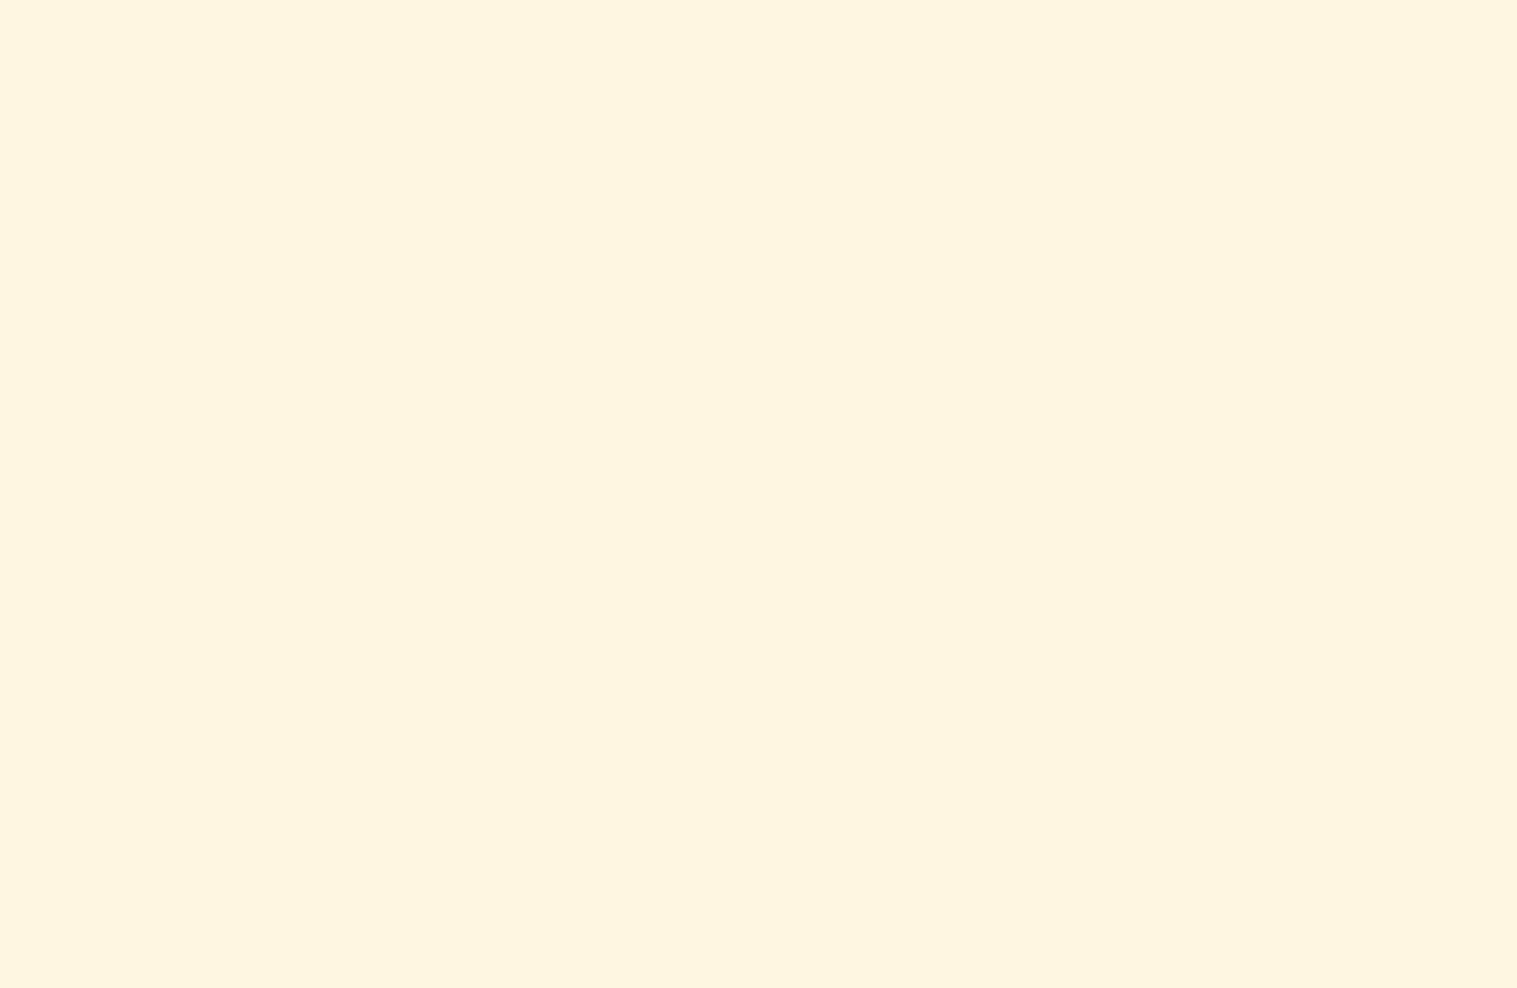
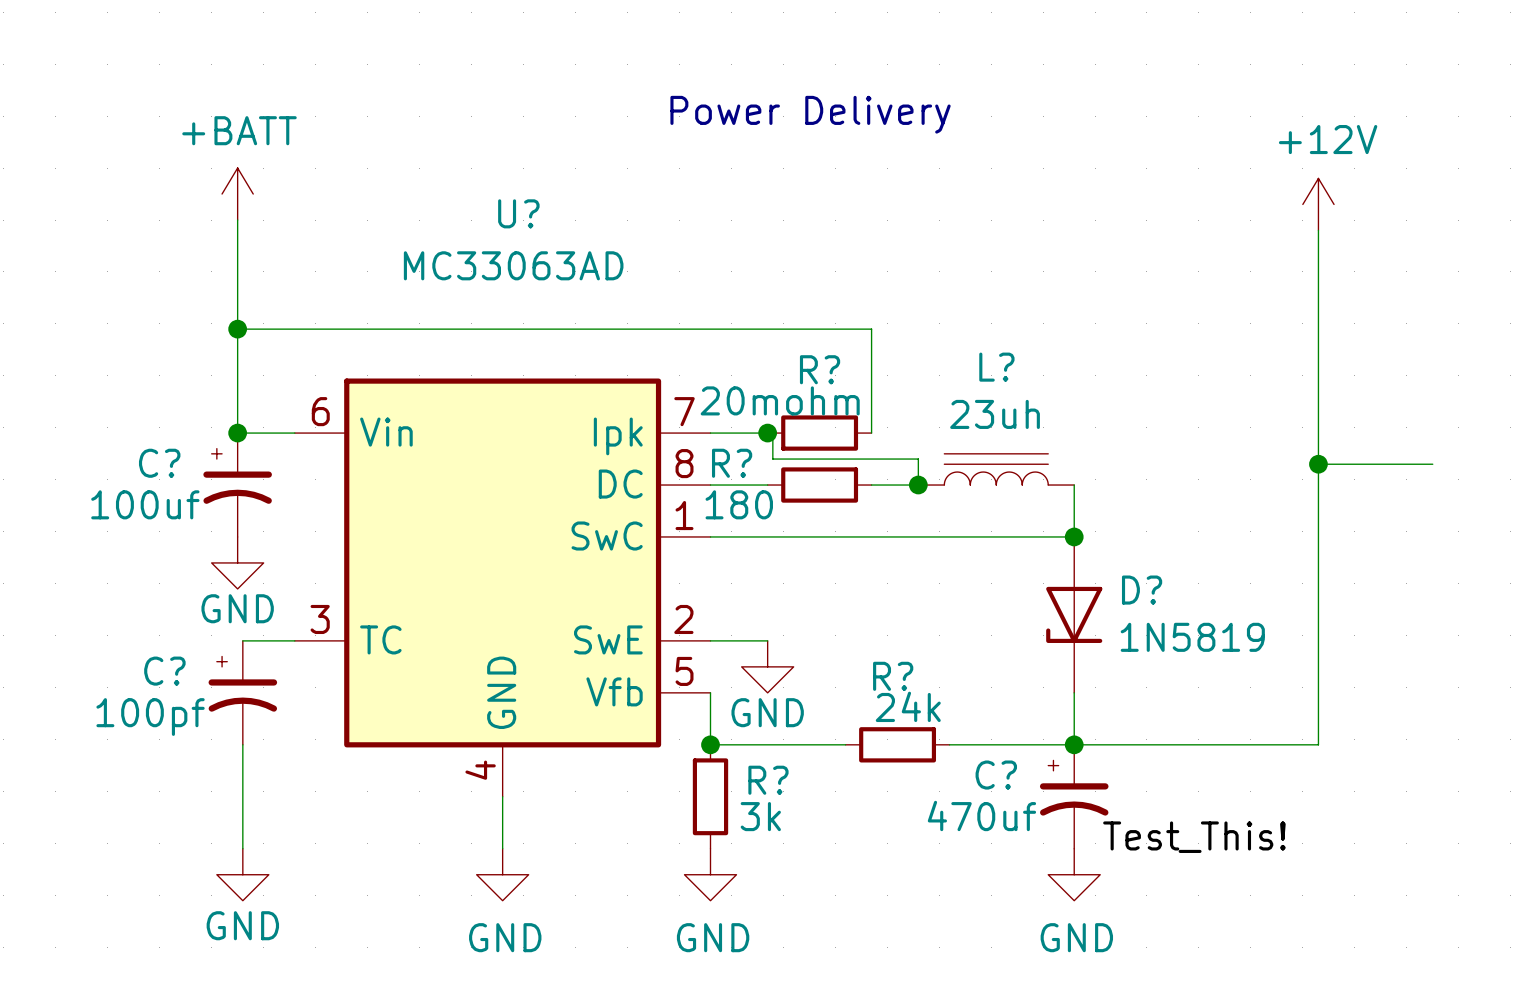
text: none -> Power Delivery (810, 114)
power symbol: none -> +BATT (237, 194)
power symbol: none -> +12V (1318, 204)
wire: none -> (237, 220) (237, 433) (294, 433)
wire: none -> (1318, 230) (1318, 744) (949, 744)
wire: none -> (237, 329) (871, 329) (871, 433)
junction: none -> (237, 329)
junction: none -> (237, 433)
wire: none -> (710, 433) (772, 433) (772, 459) (918, 459) (918, 485) (871, 485)
junction: none -> (767, 433)
R?: none -> 20mohm (819, 433)
wire: none -> (1318, 464) (1432, 464)
junction: none -> (1318, 464)
L?: none -> 23uh (996, 469)
C?: none -> 100uf (237, 485)
wire: none -> (710, 485) (767, 485)
R?: none -> 180 (819, 485)
junction: none -> (918, 485)
wire: none -> (1074, 485) (1074, 536) (710, 536)
junction: none -> (1074, 536)
power symbol: none -> GND (237, 562)
U?: none -> MC33063AD (502, 587)
D?: none -> 1N5819 (1074, 614)
wire: none -> (242, 640) (294, 640)
wire: none -> (710, 640) (767, 640)
power symbol: none -> GND (767, 666)
C?: none -> 100pf (242, 692)
wire: none -> (710, 692) (710, 744) (845, 744)
wire: none -> (1074, 692) (1074, 744)
wire: none -> (242, 744) (242, 848)
junction: none -> (710, 744)
R?: none -> 24k (897, 744)
junction: none -> (1074, 744)
wire: none -> (502, 796) (502, 848)
R?: none -> 3k (710, 796)
C?: none -> 470uf (1074, 796)
label: none -> Test_This! (1194, 837)
power symbol: none -> GND (242, 874)
power symbol: none -> GND (502, 874)
power symbol: none -> GND (710, 874)
power symbol: none -> GND (1074, 874)

